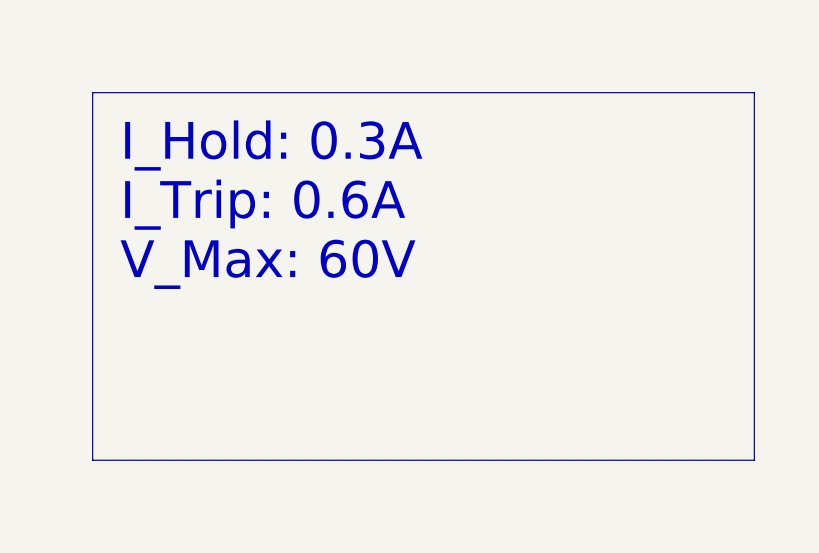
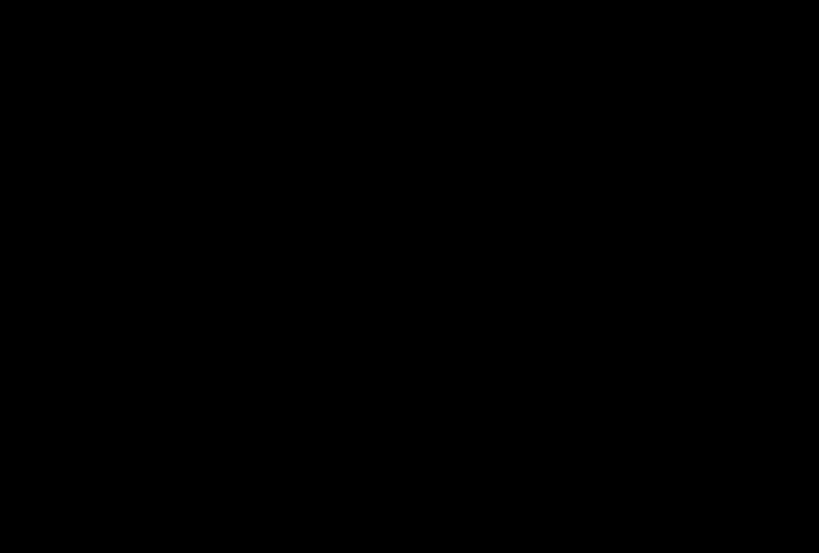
line: (92, 92) (754, 92) (754, 460) (92, 460) (92, 92) -> none
text: I_Hold: 0.3A (273, 145) -> none
text: I_Trip: 0.6A (265, 204) -> none
text: V_Max: 60V (268, 264) -> none

